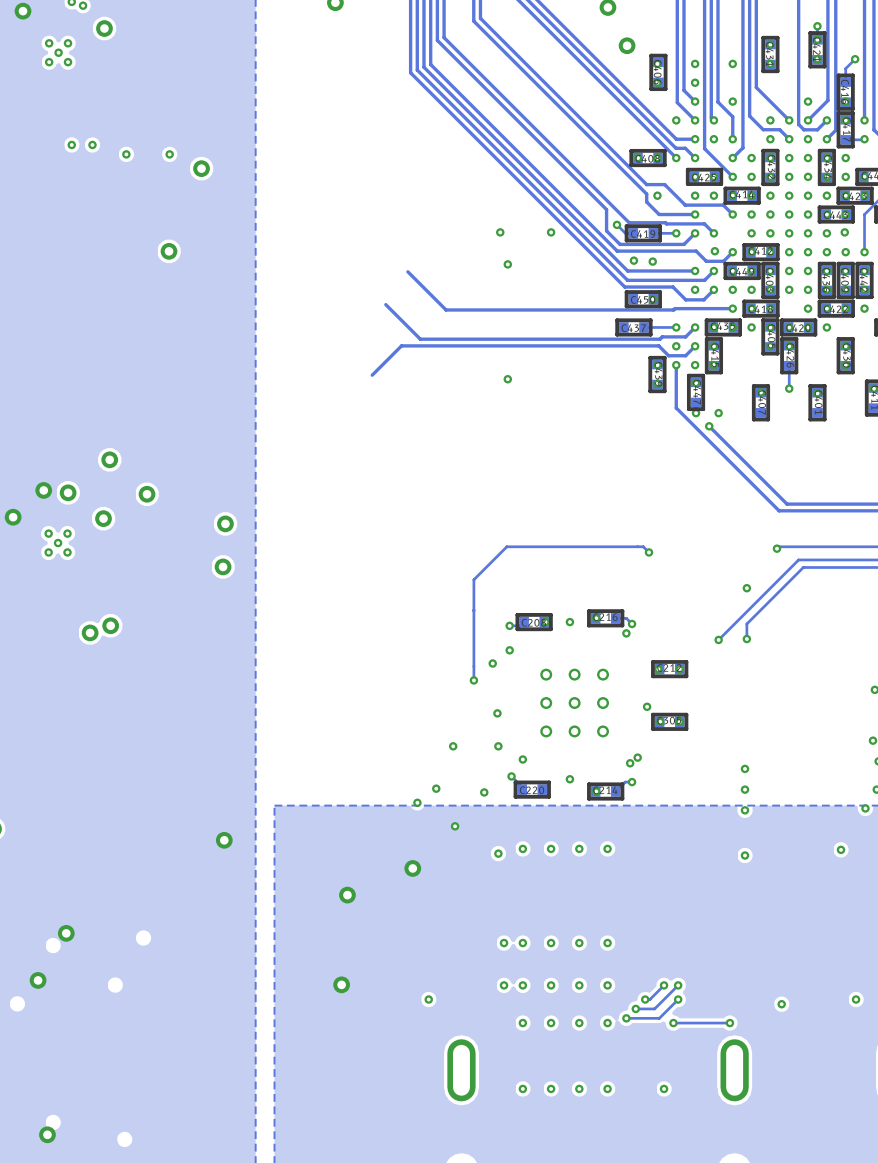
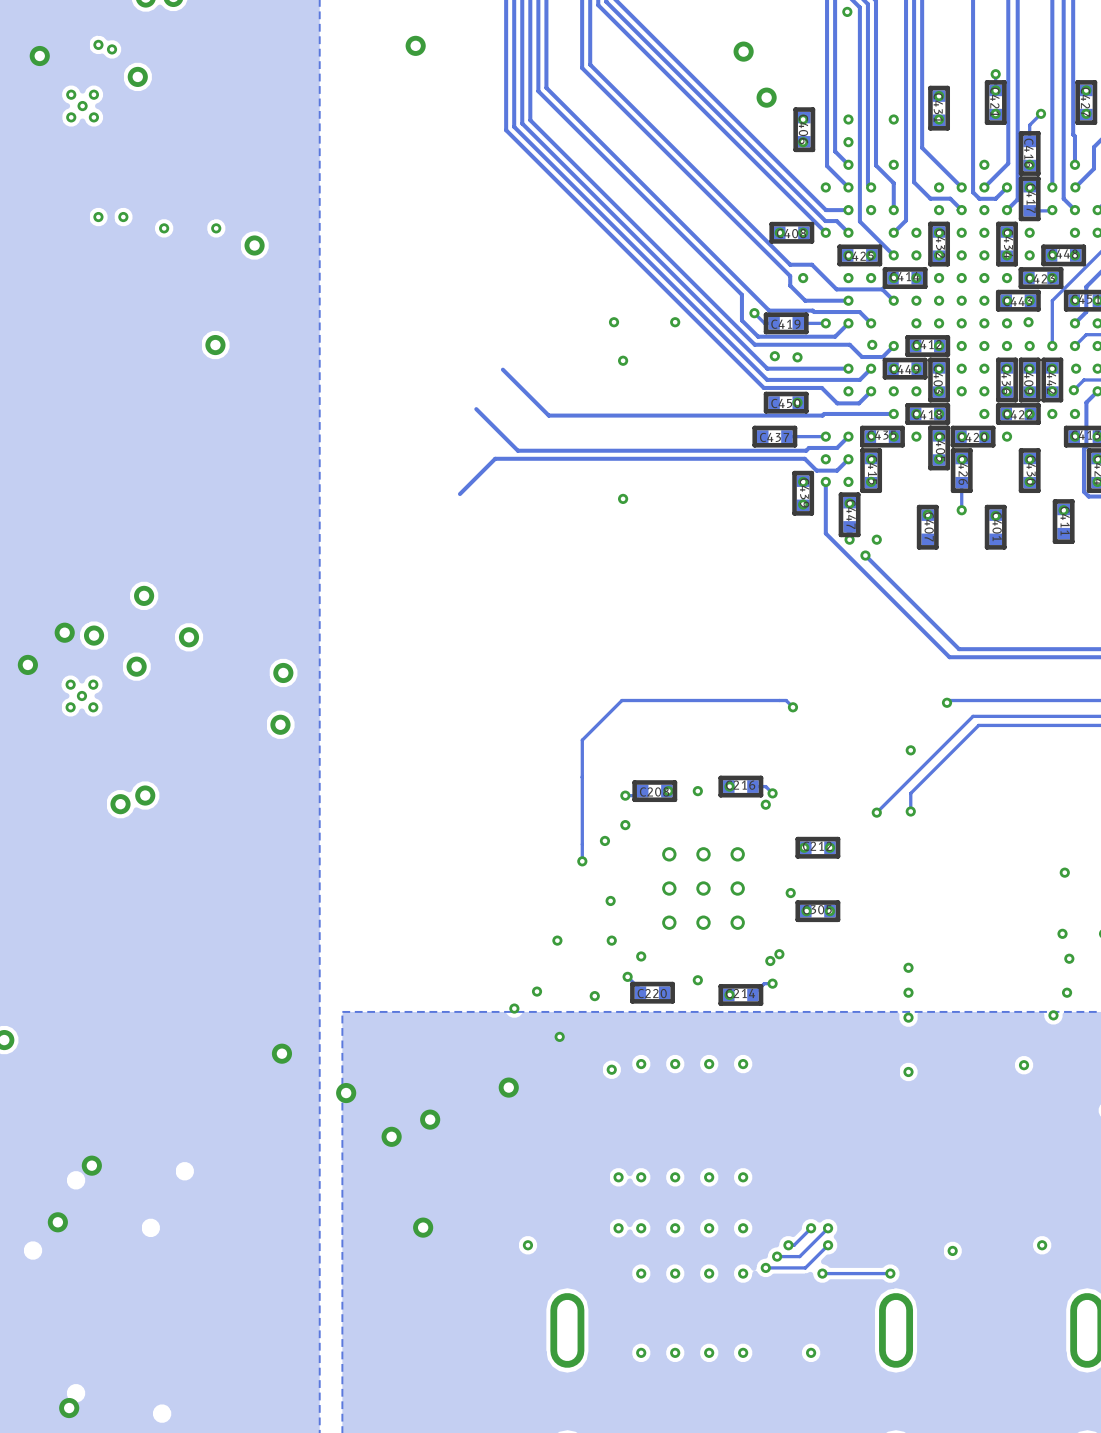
via: none -> (346, 1093)
via: none -> (391, 1136)

